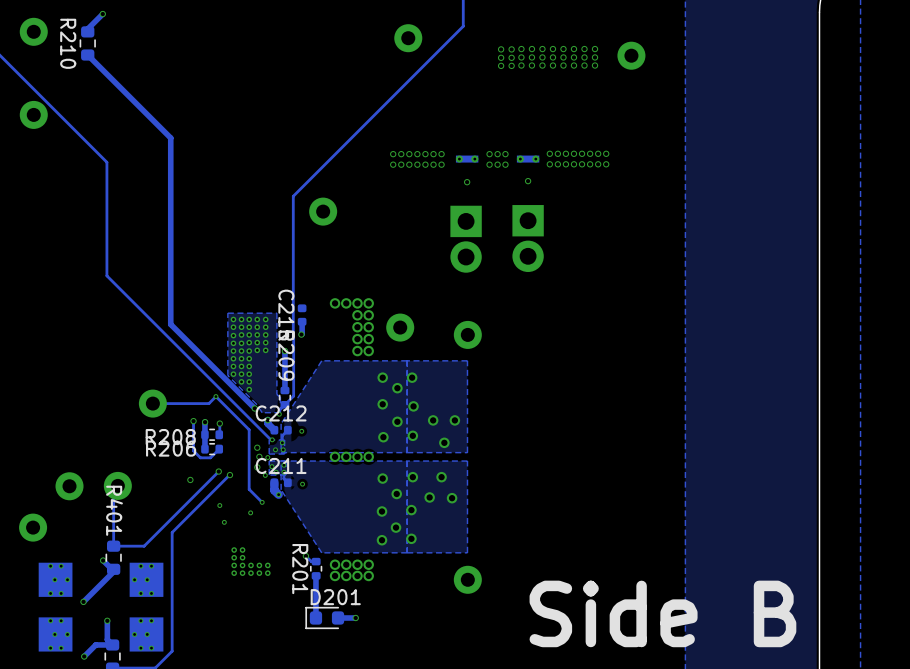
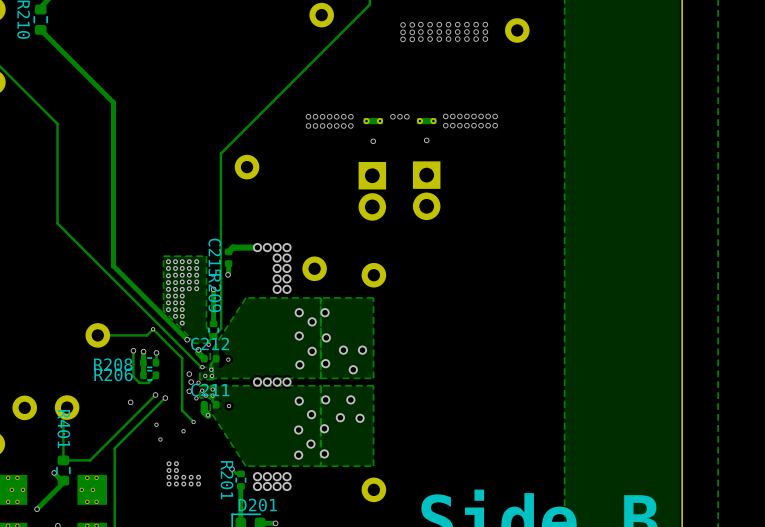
via: (489, 164) -> none
via: (497, 164) -> none
via: (505, 164) -> none
track: none -> (257, 247) (232, 247) (228, 251)

